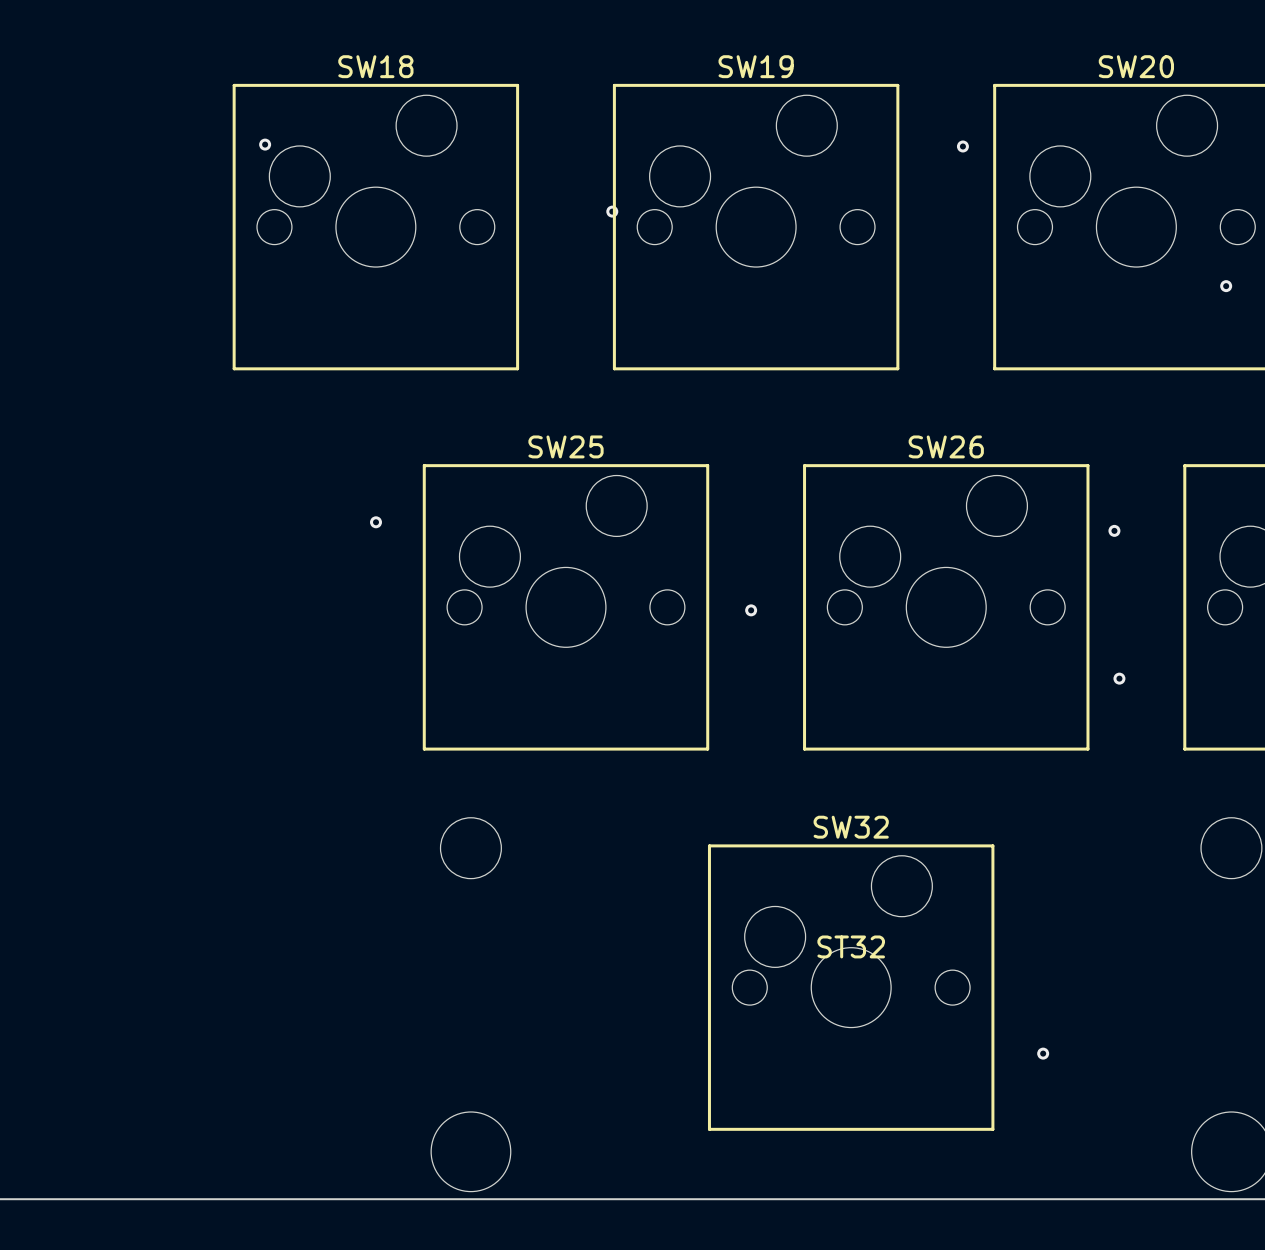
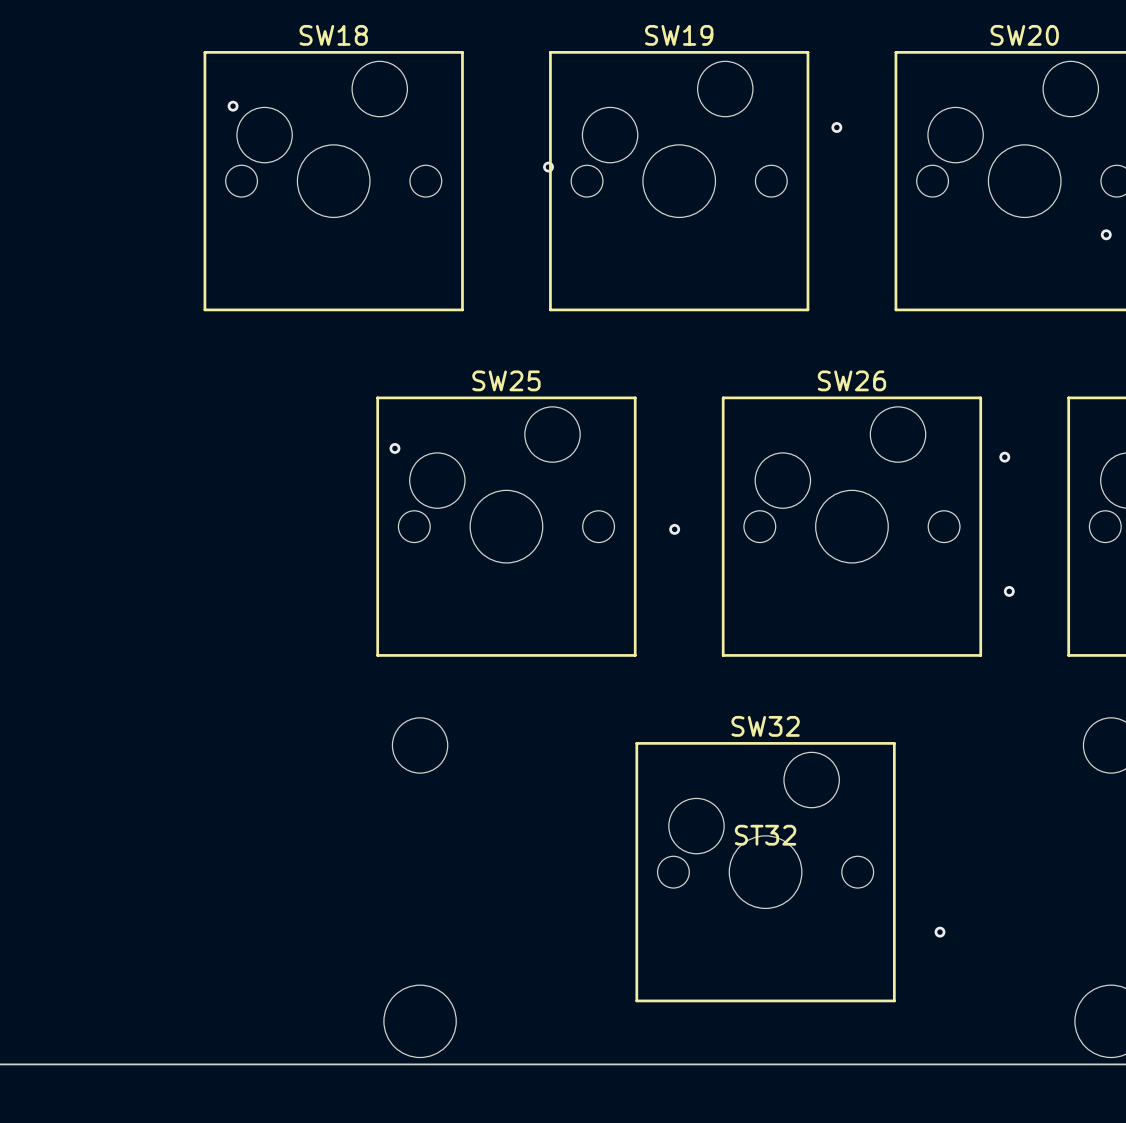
via position: (962, 146) -> (836, 127)
via position: (376, 522) -> (394, 448)

